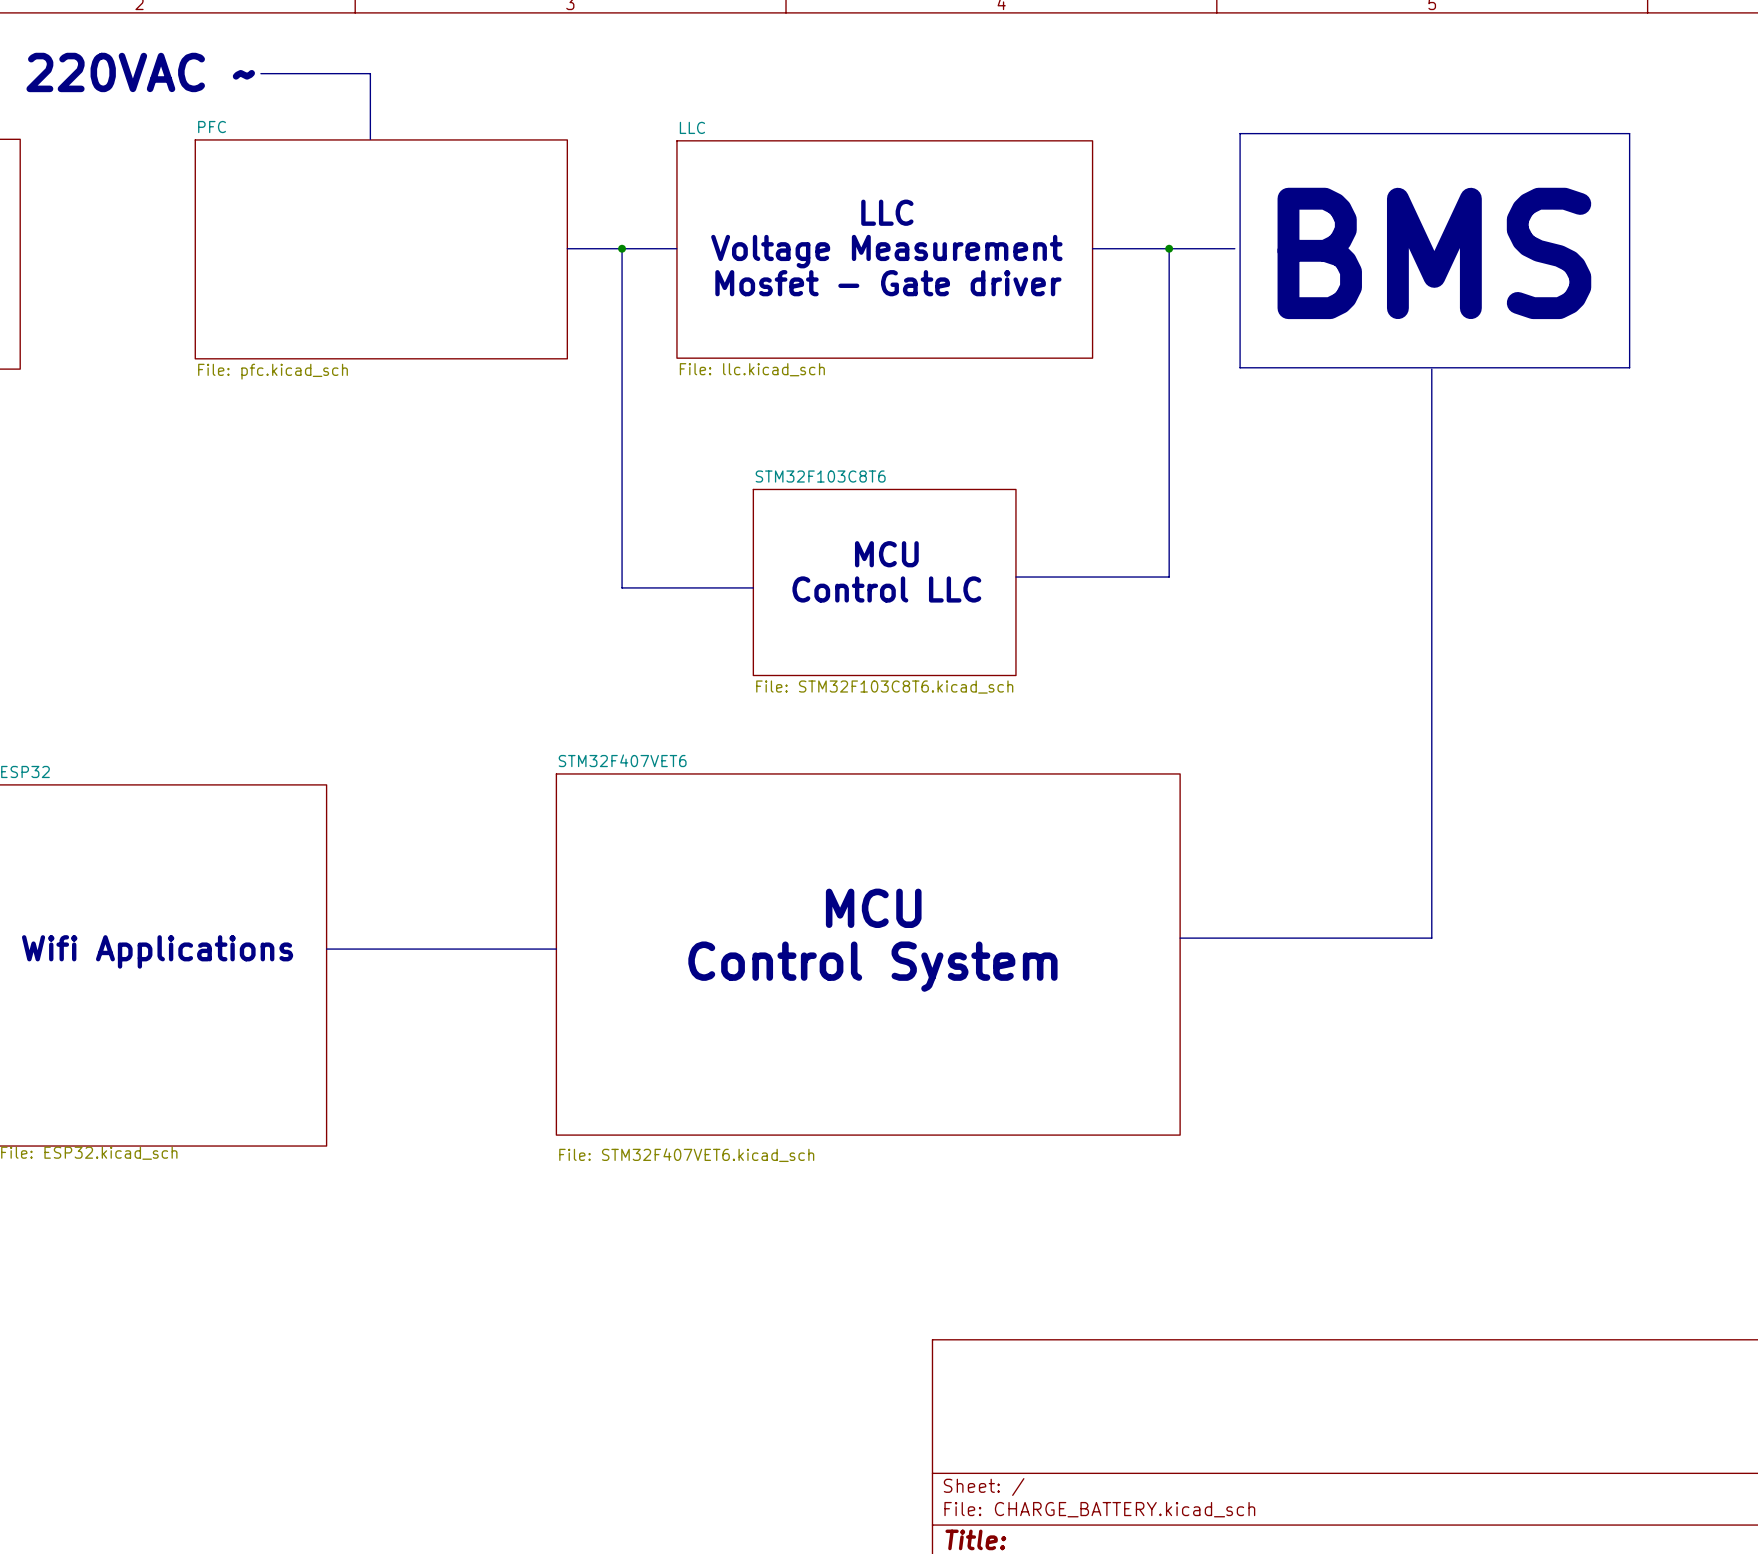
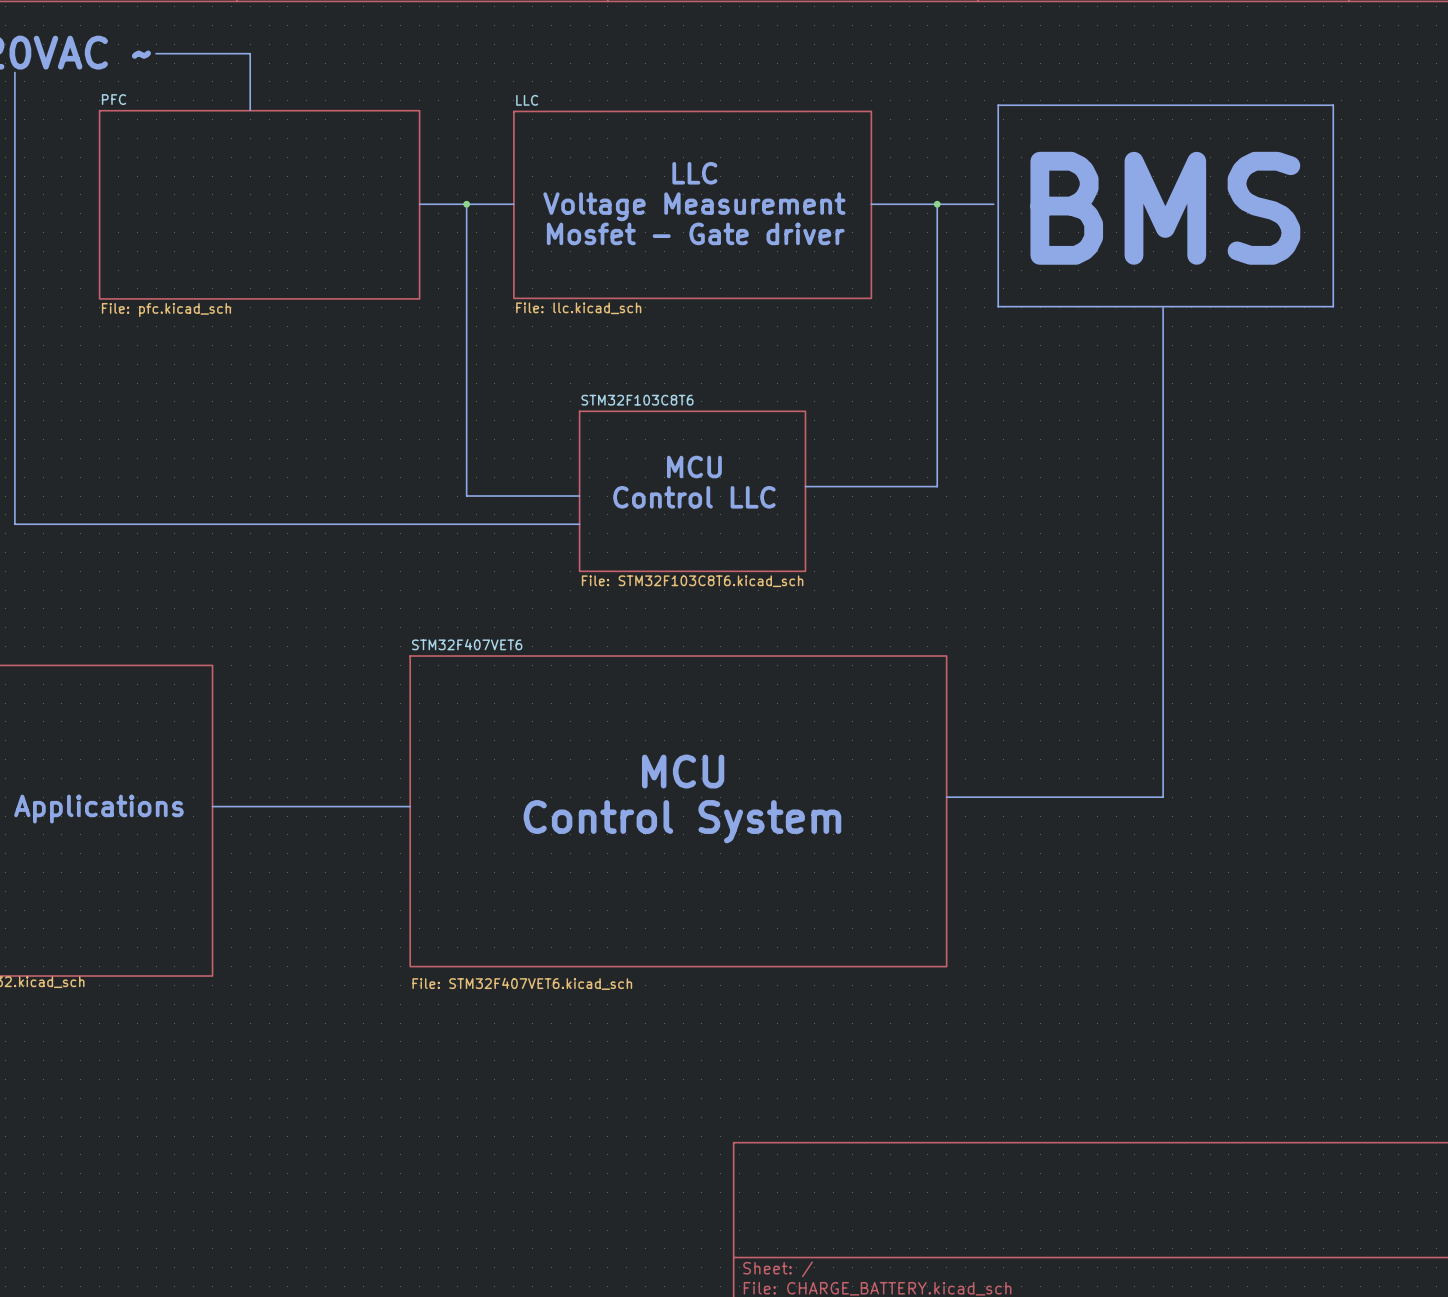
bus: none -> (14, 72) (14, 524) (579, 524)

